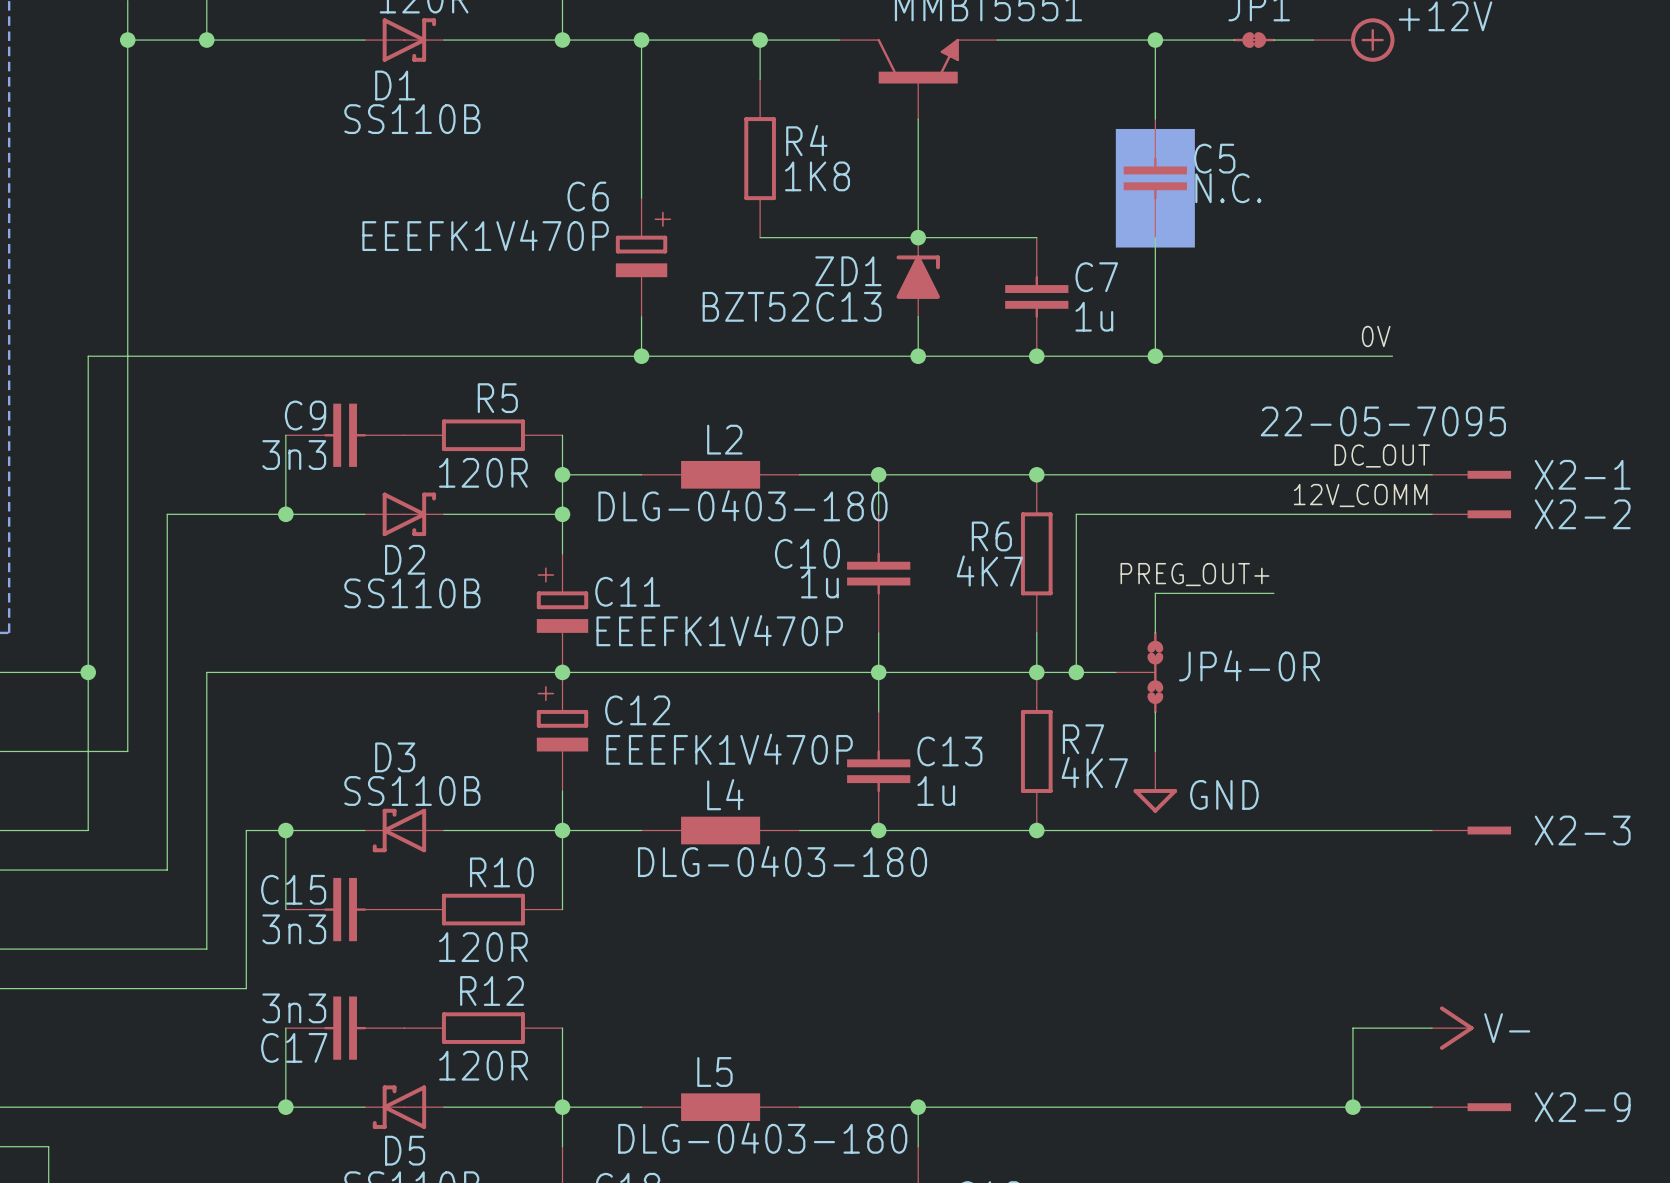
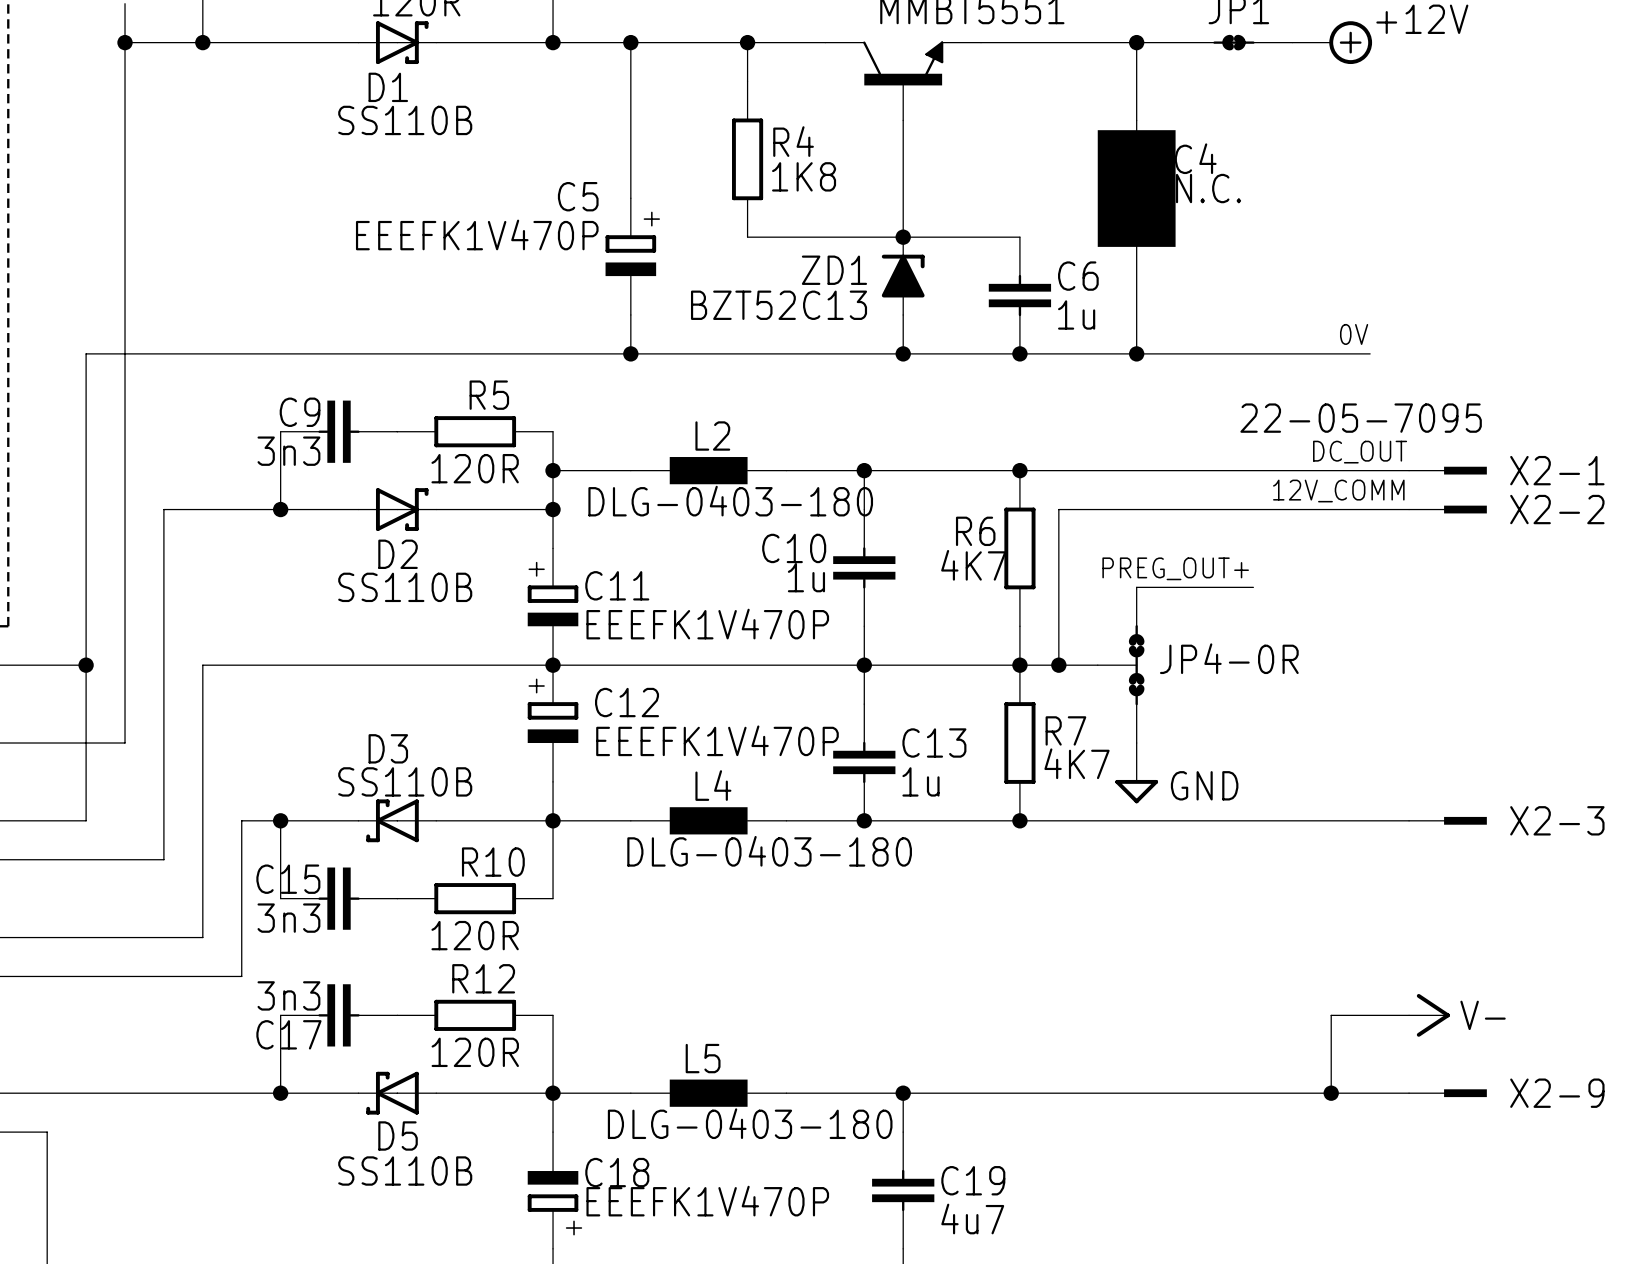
C5 name: C5 (1214, 158) -> C4 (1195, 158)
C6 name: C6 (588, 196) -> C5 (578, 196)
C7 name: C7 (1096, 277) -> C6 (1078, 276)

